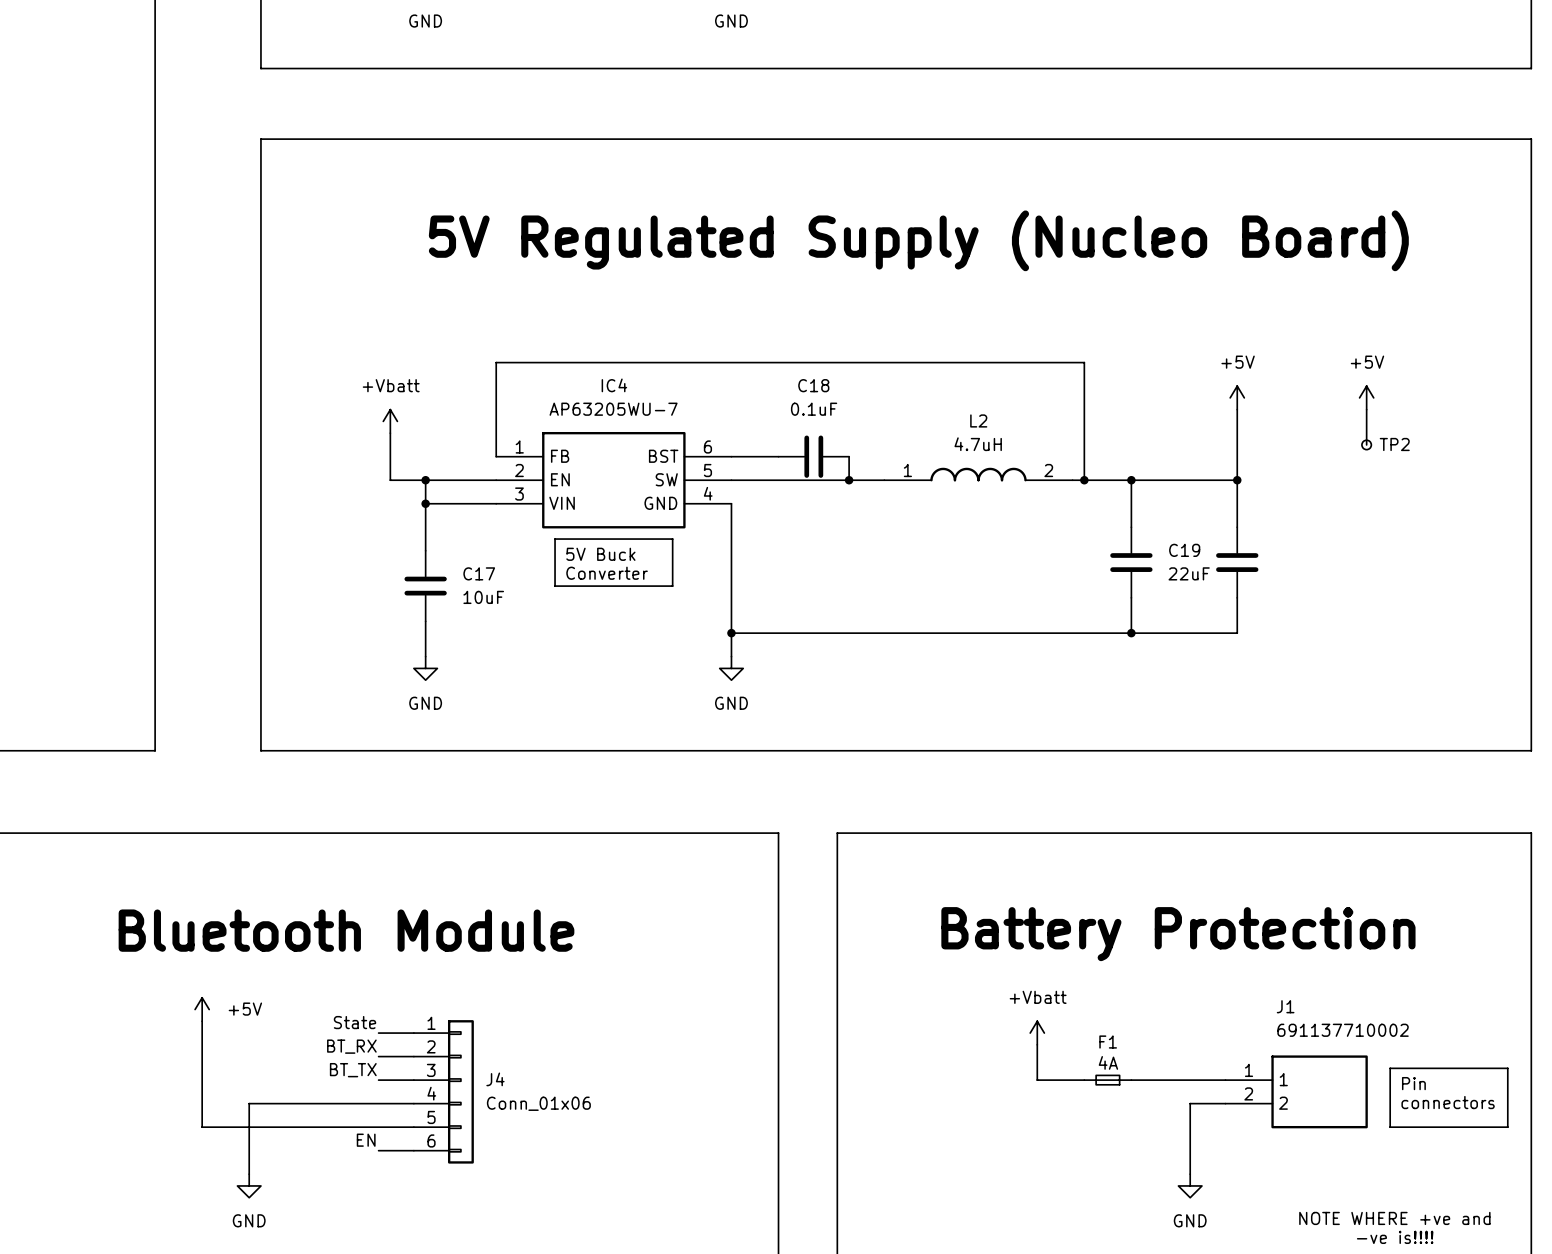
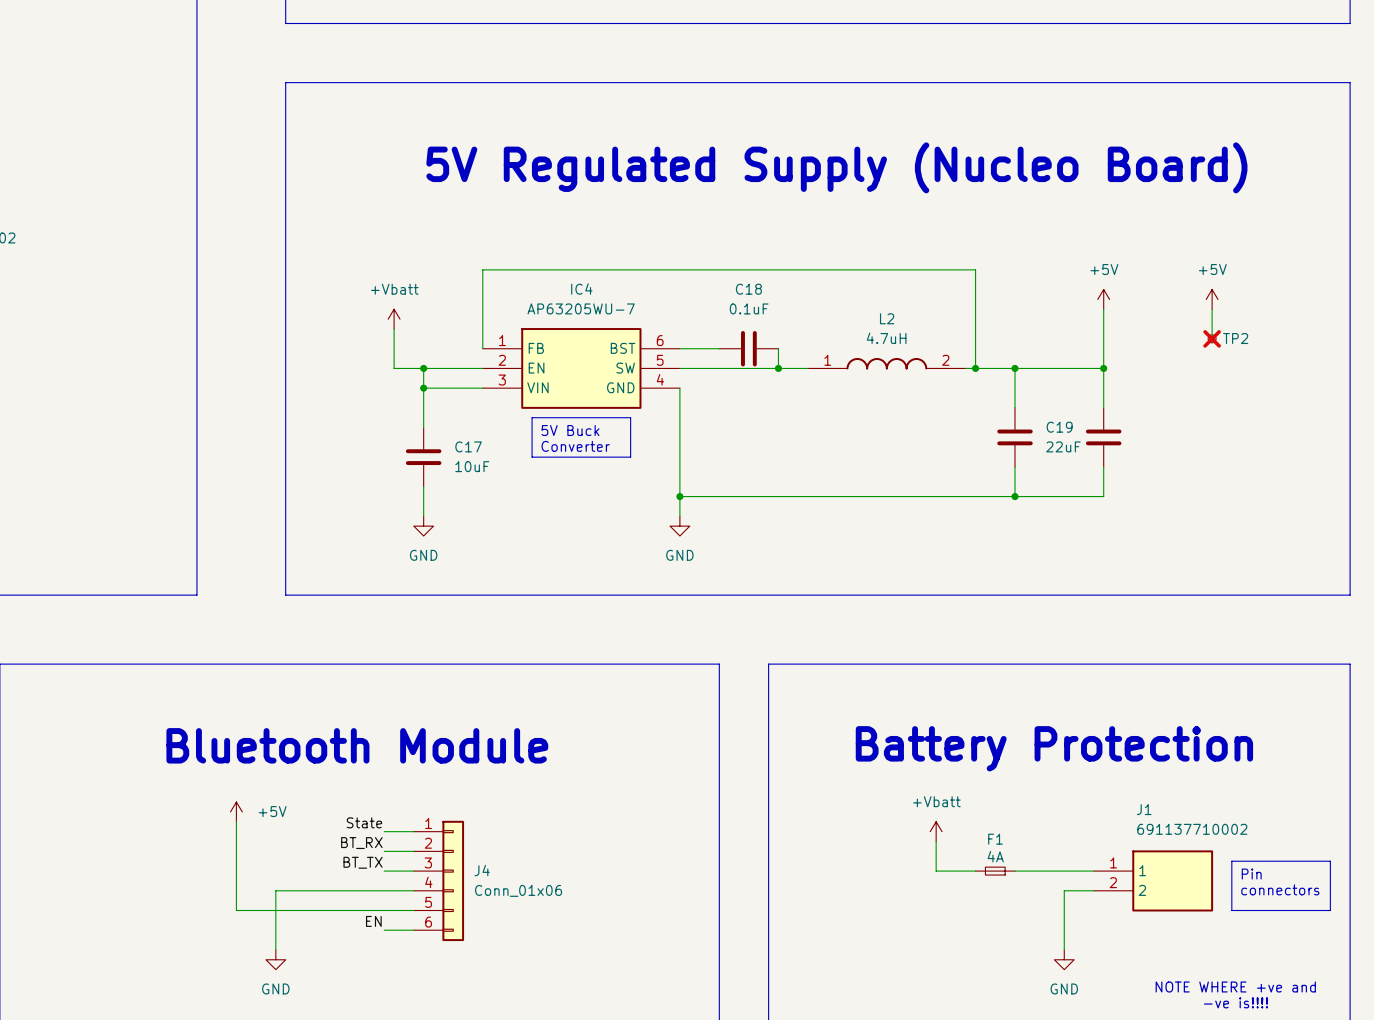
TP2 do-not-place cross: none -> (1212, 338)

